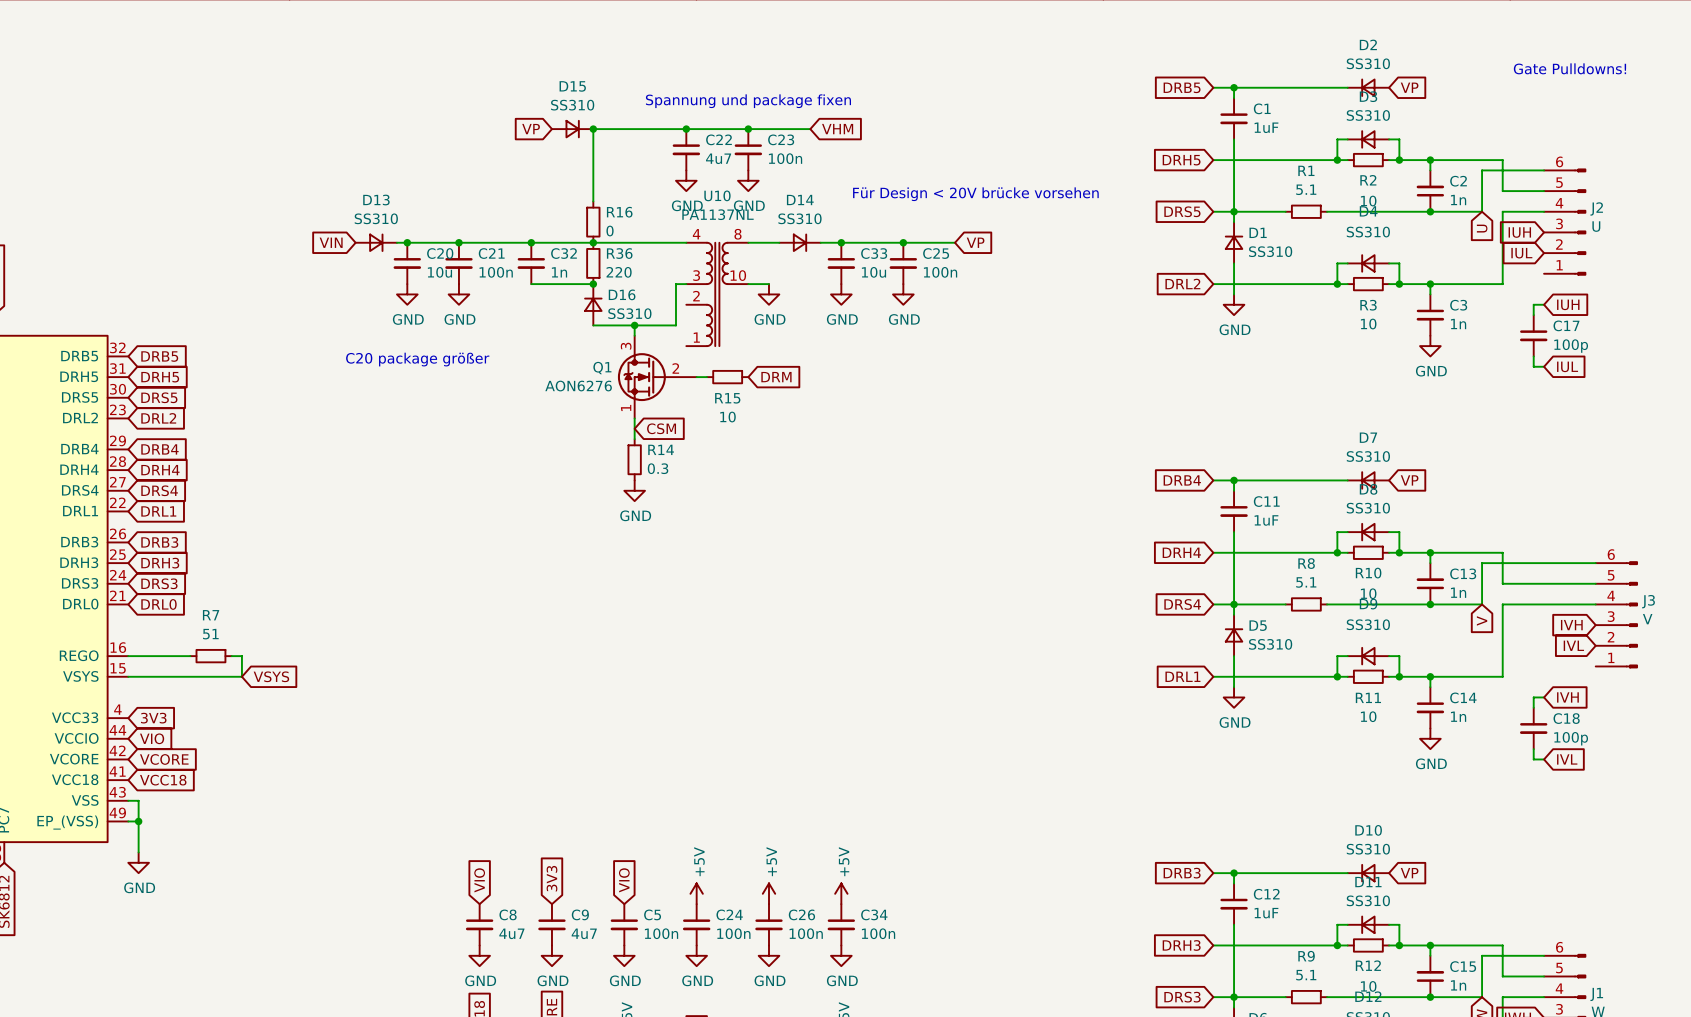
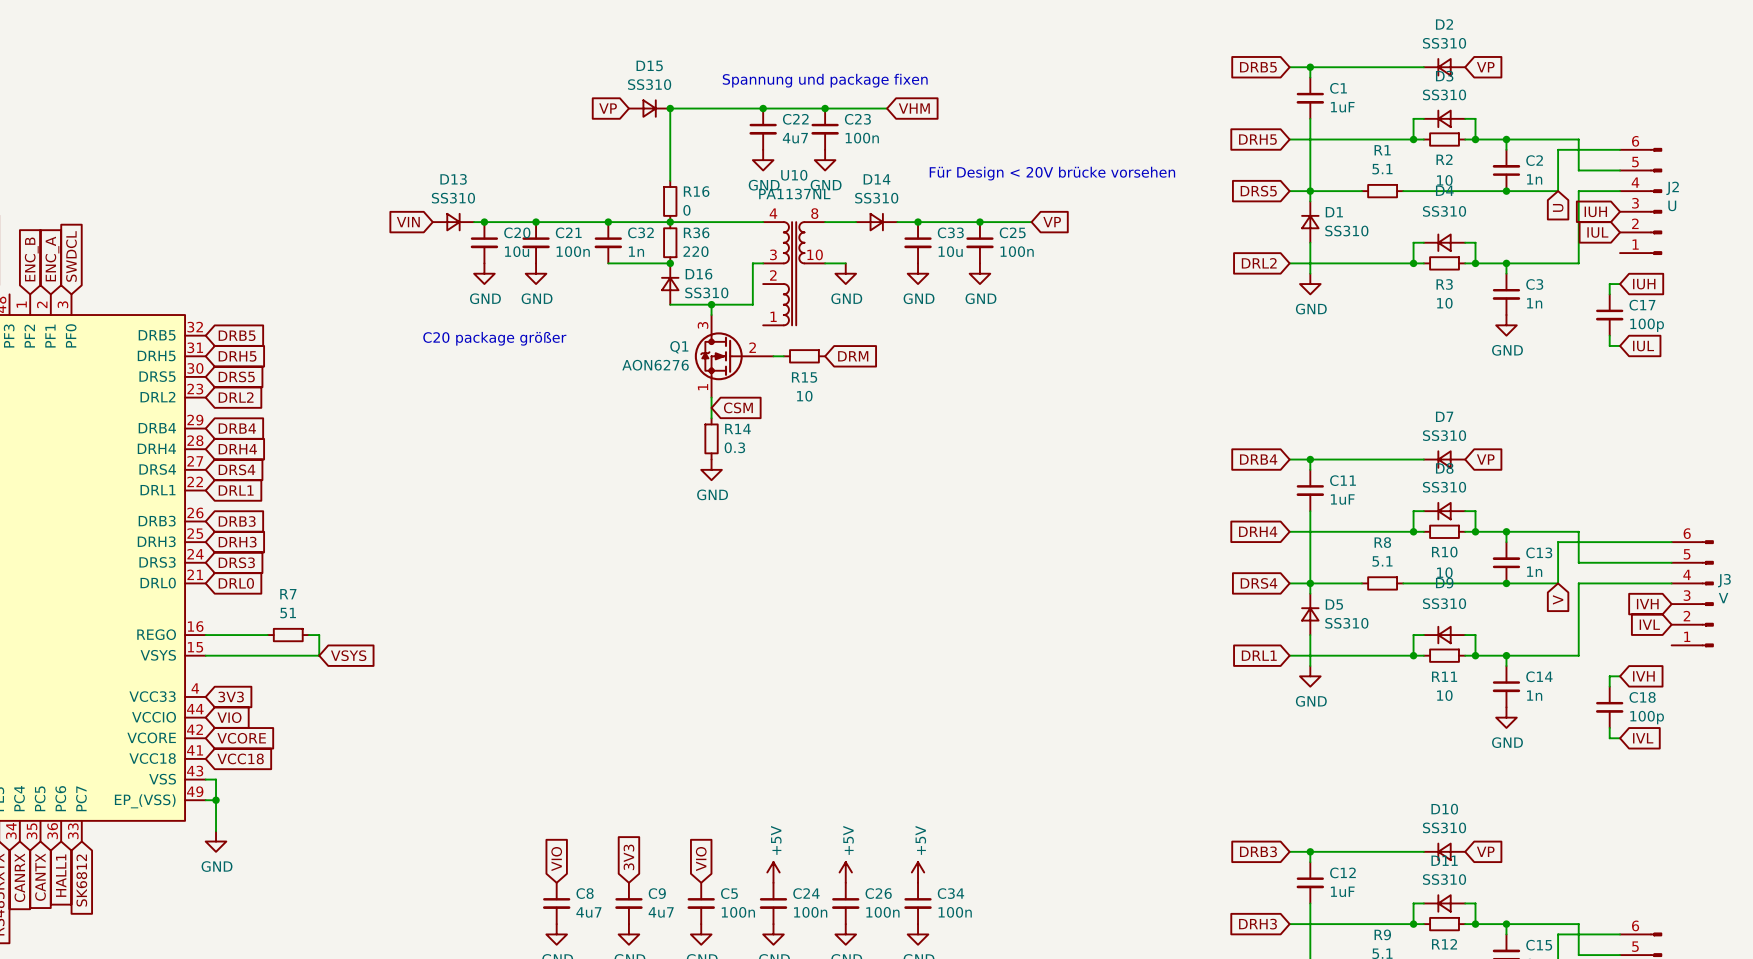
text: Gate Pulldowns! (1569, 68) -> none

